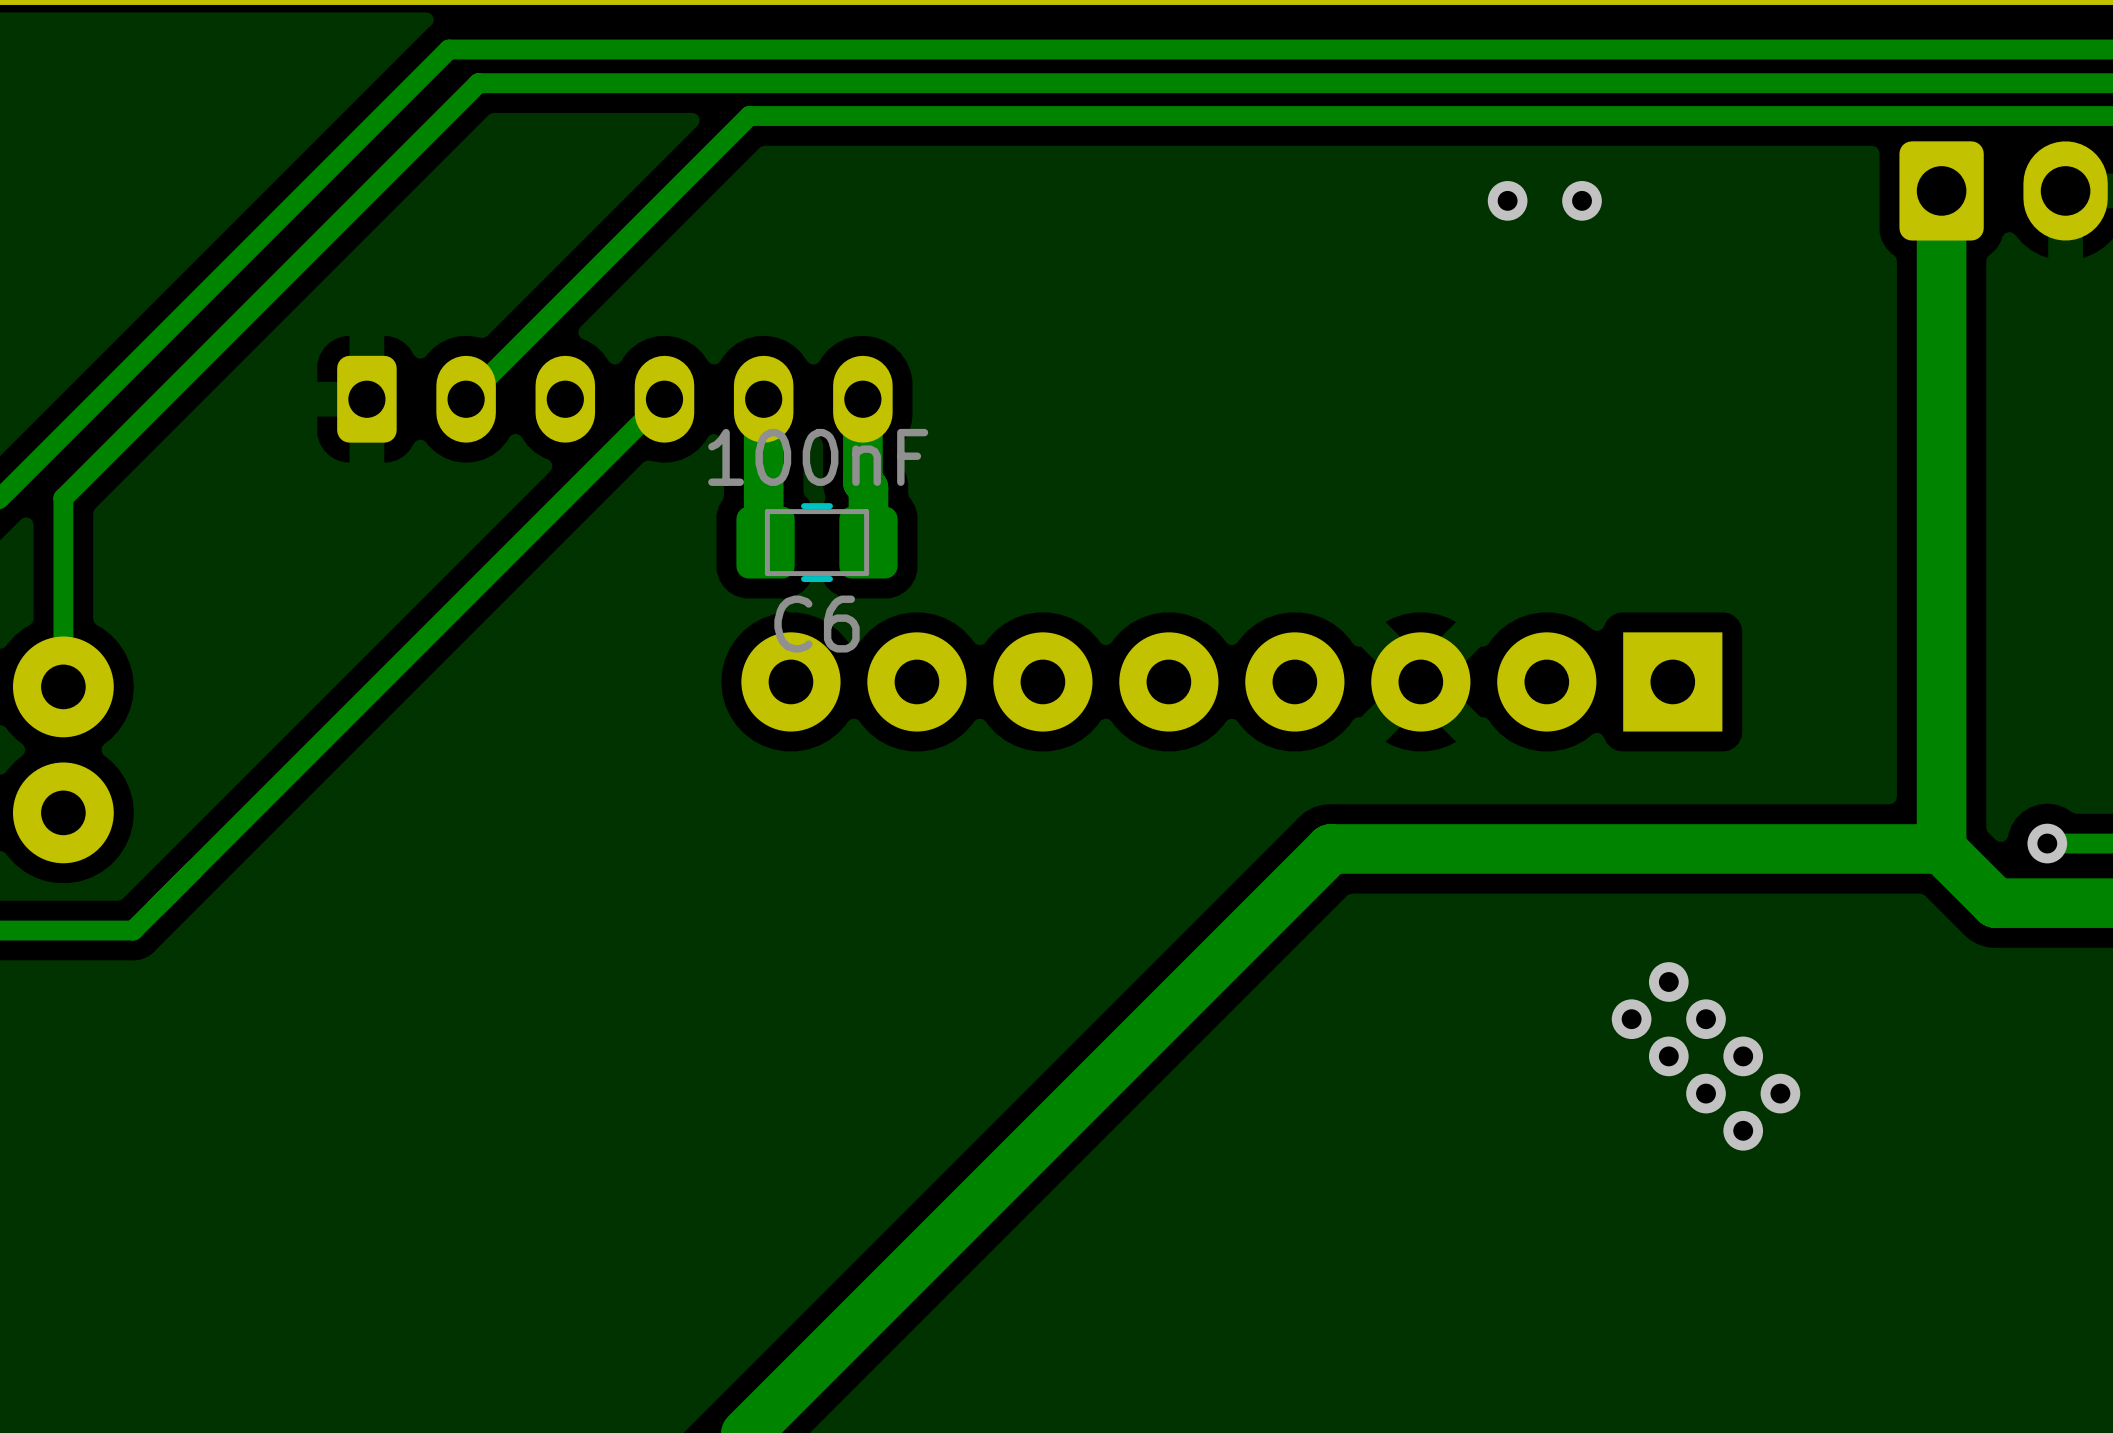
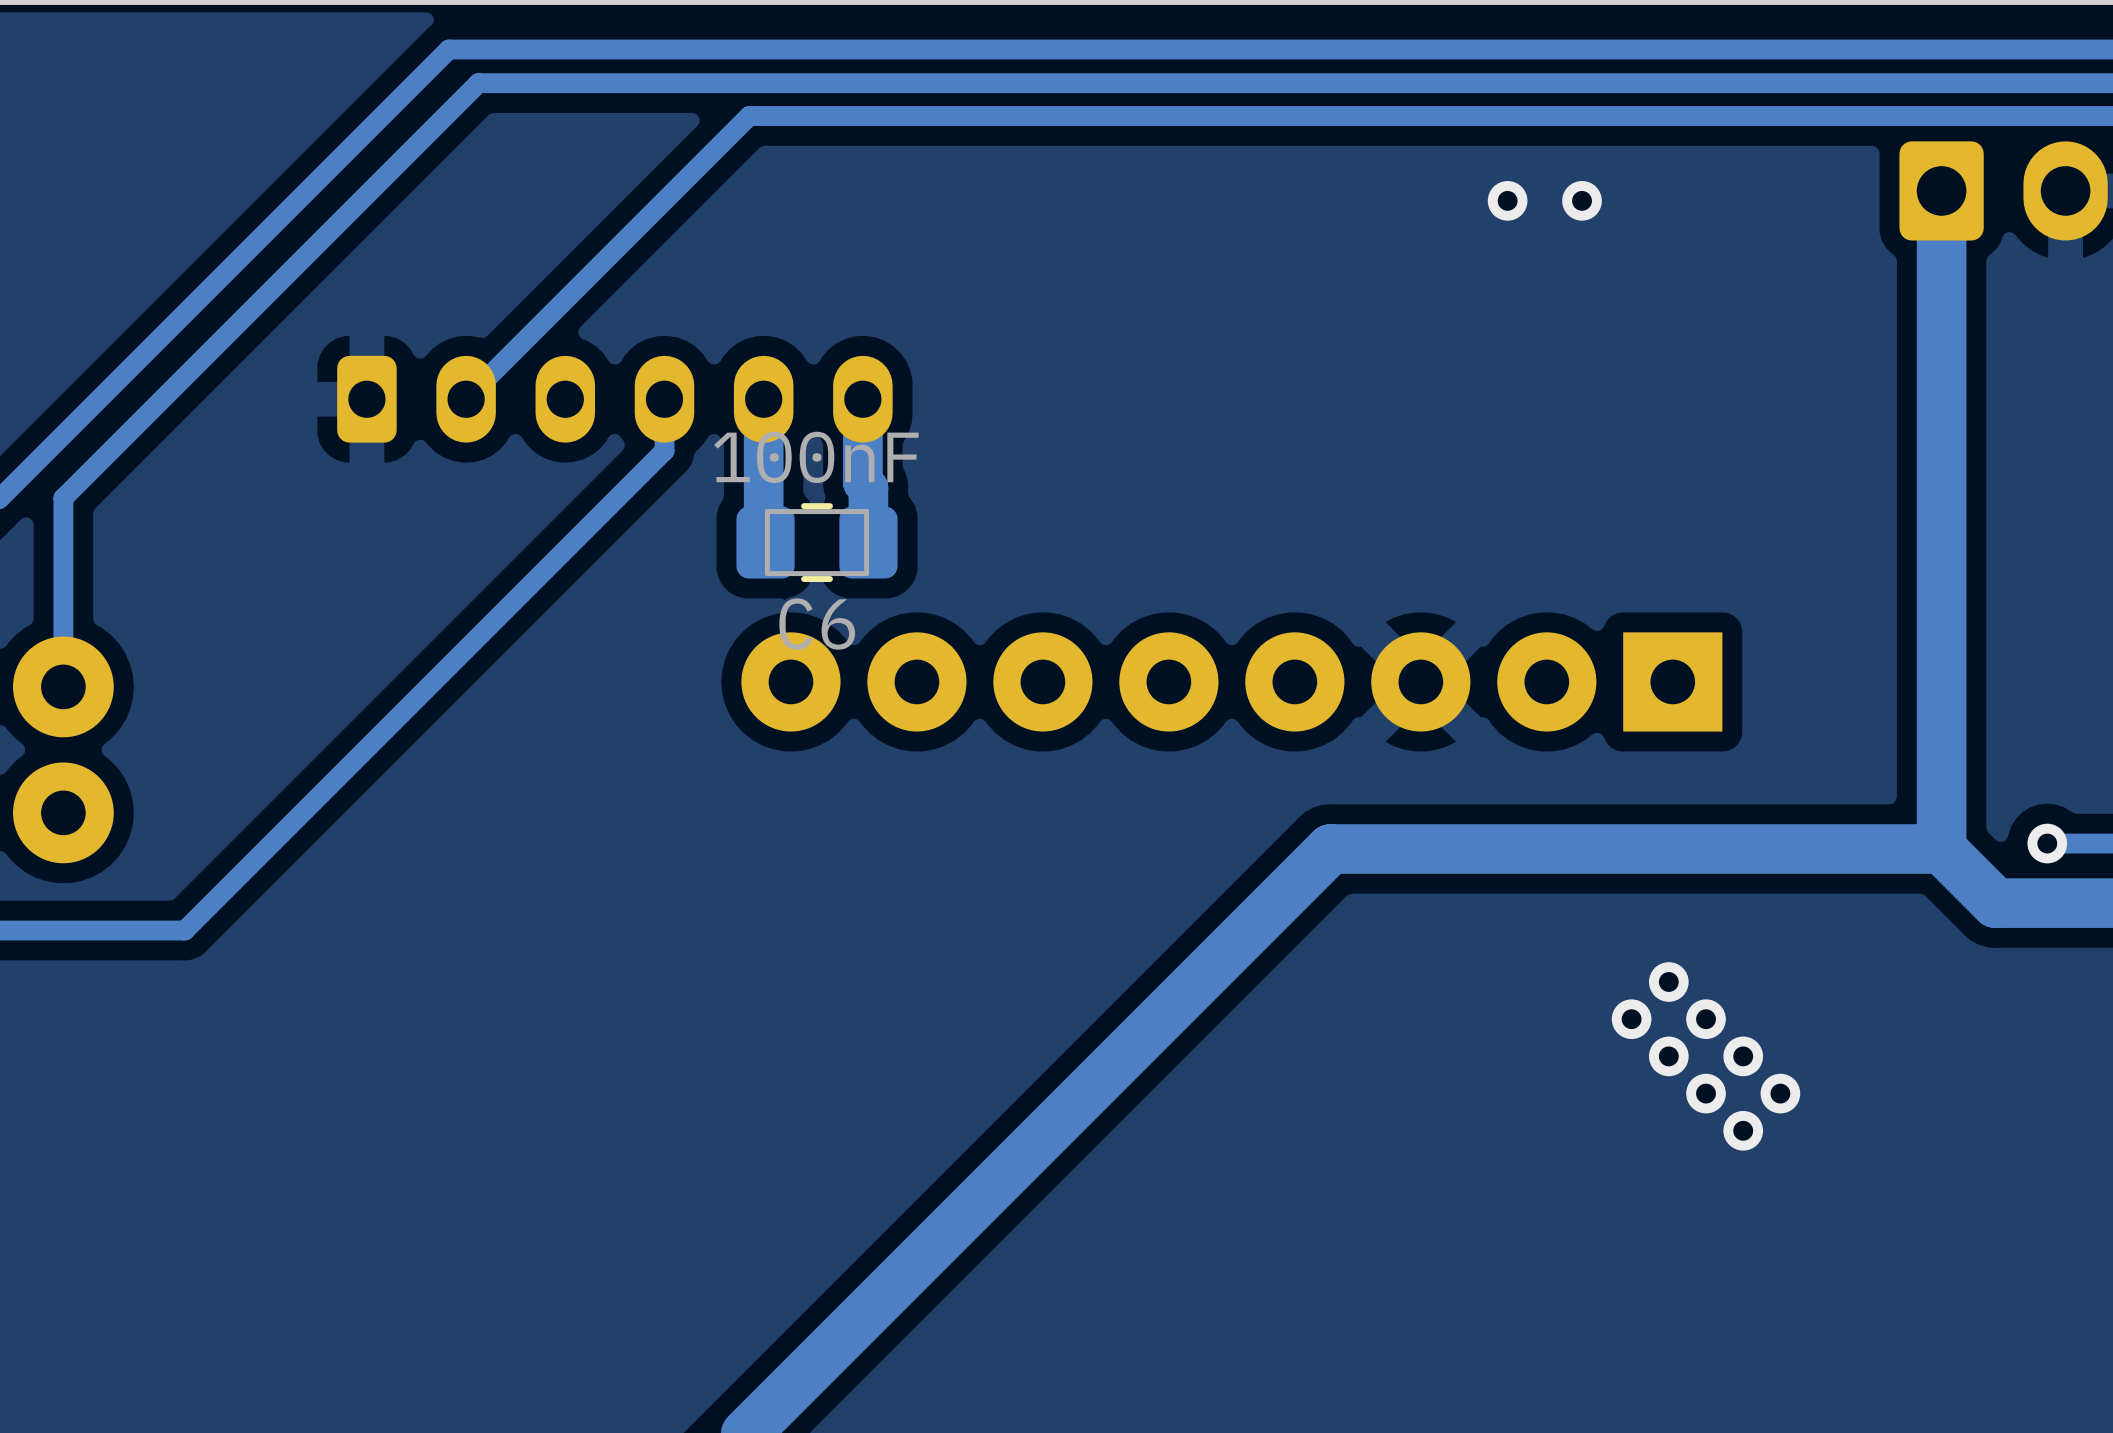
track: (664, 399) (133, 930) -> (664, 399) (664, 450) (184, 930) (133, 930)

